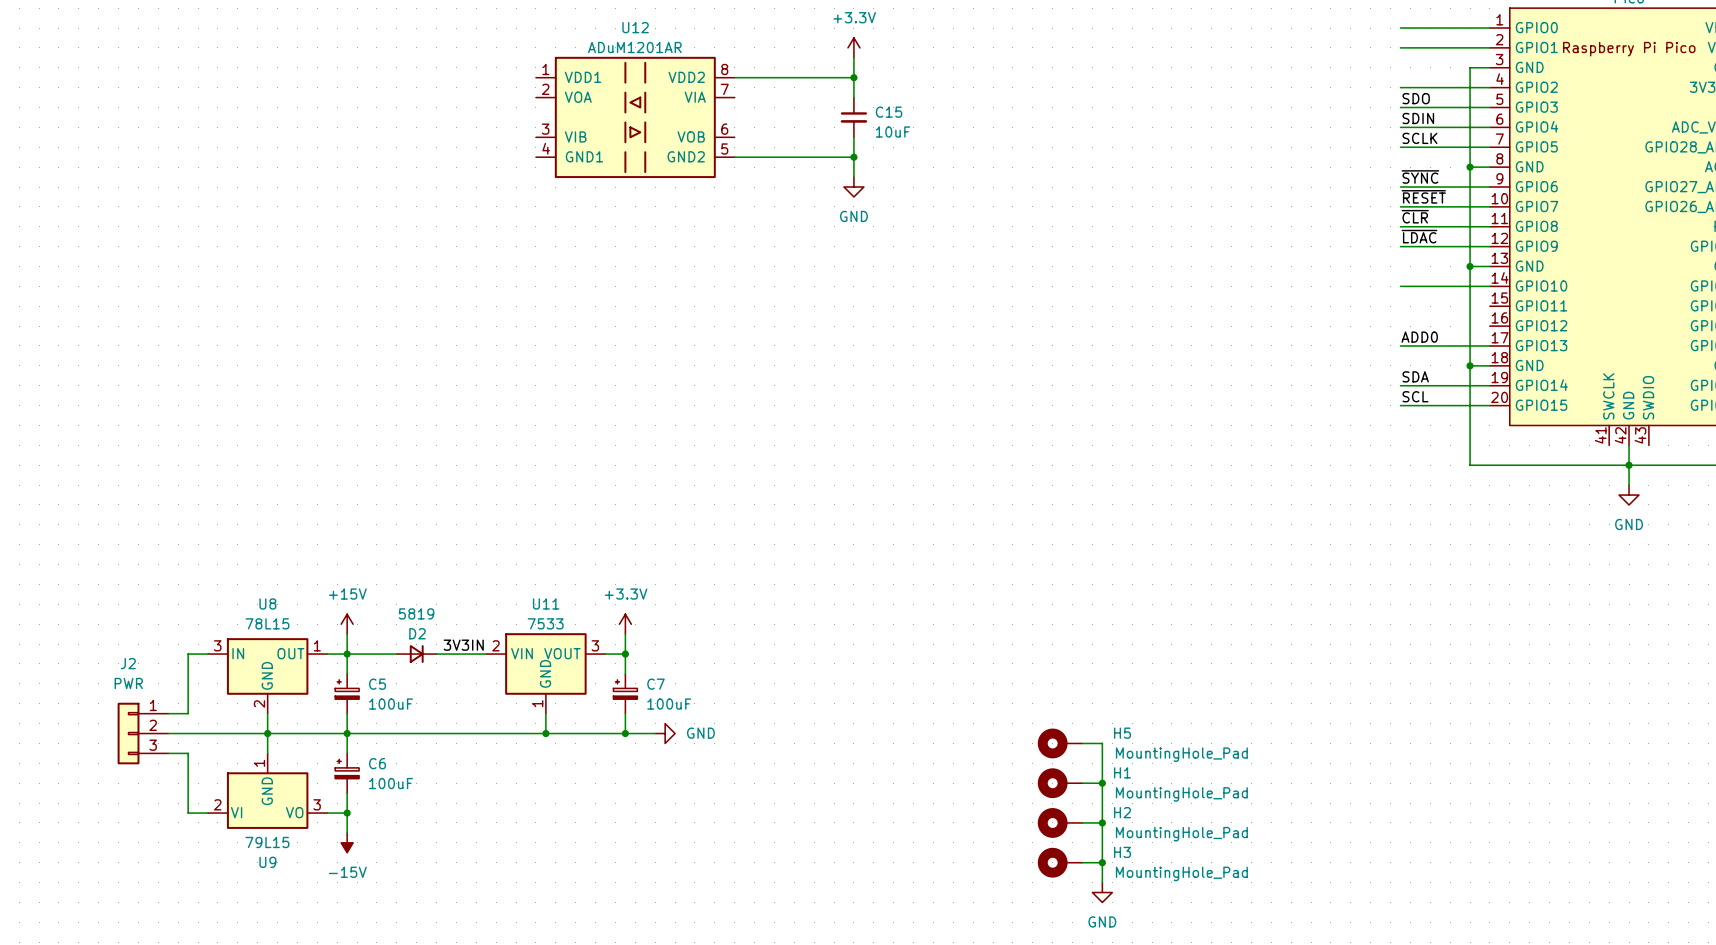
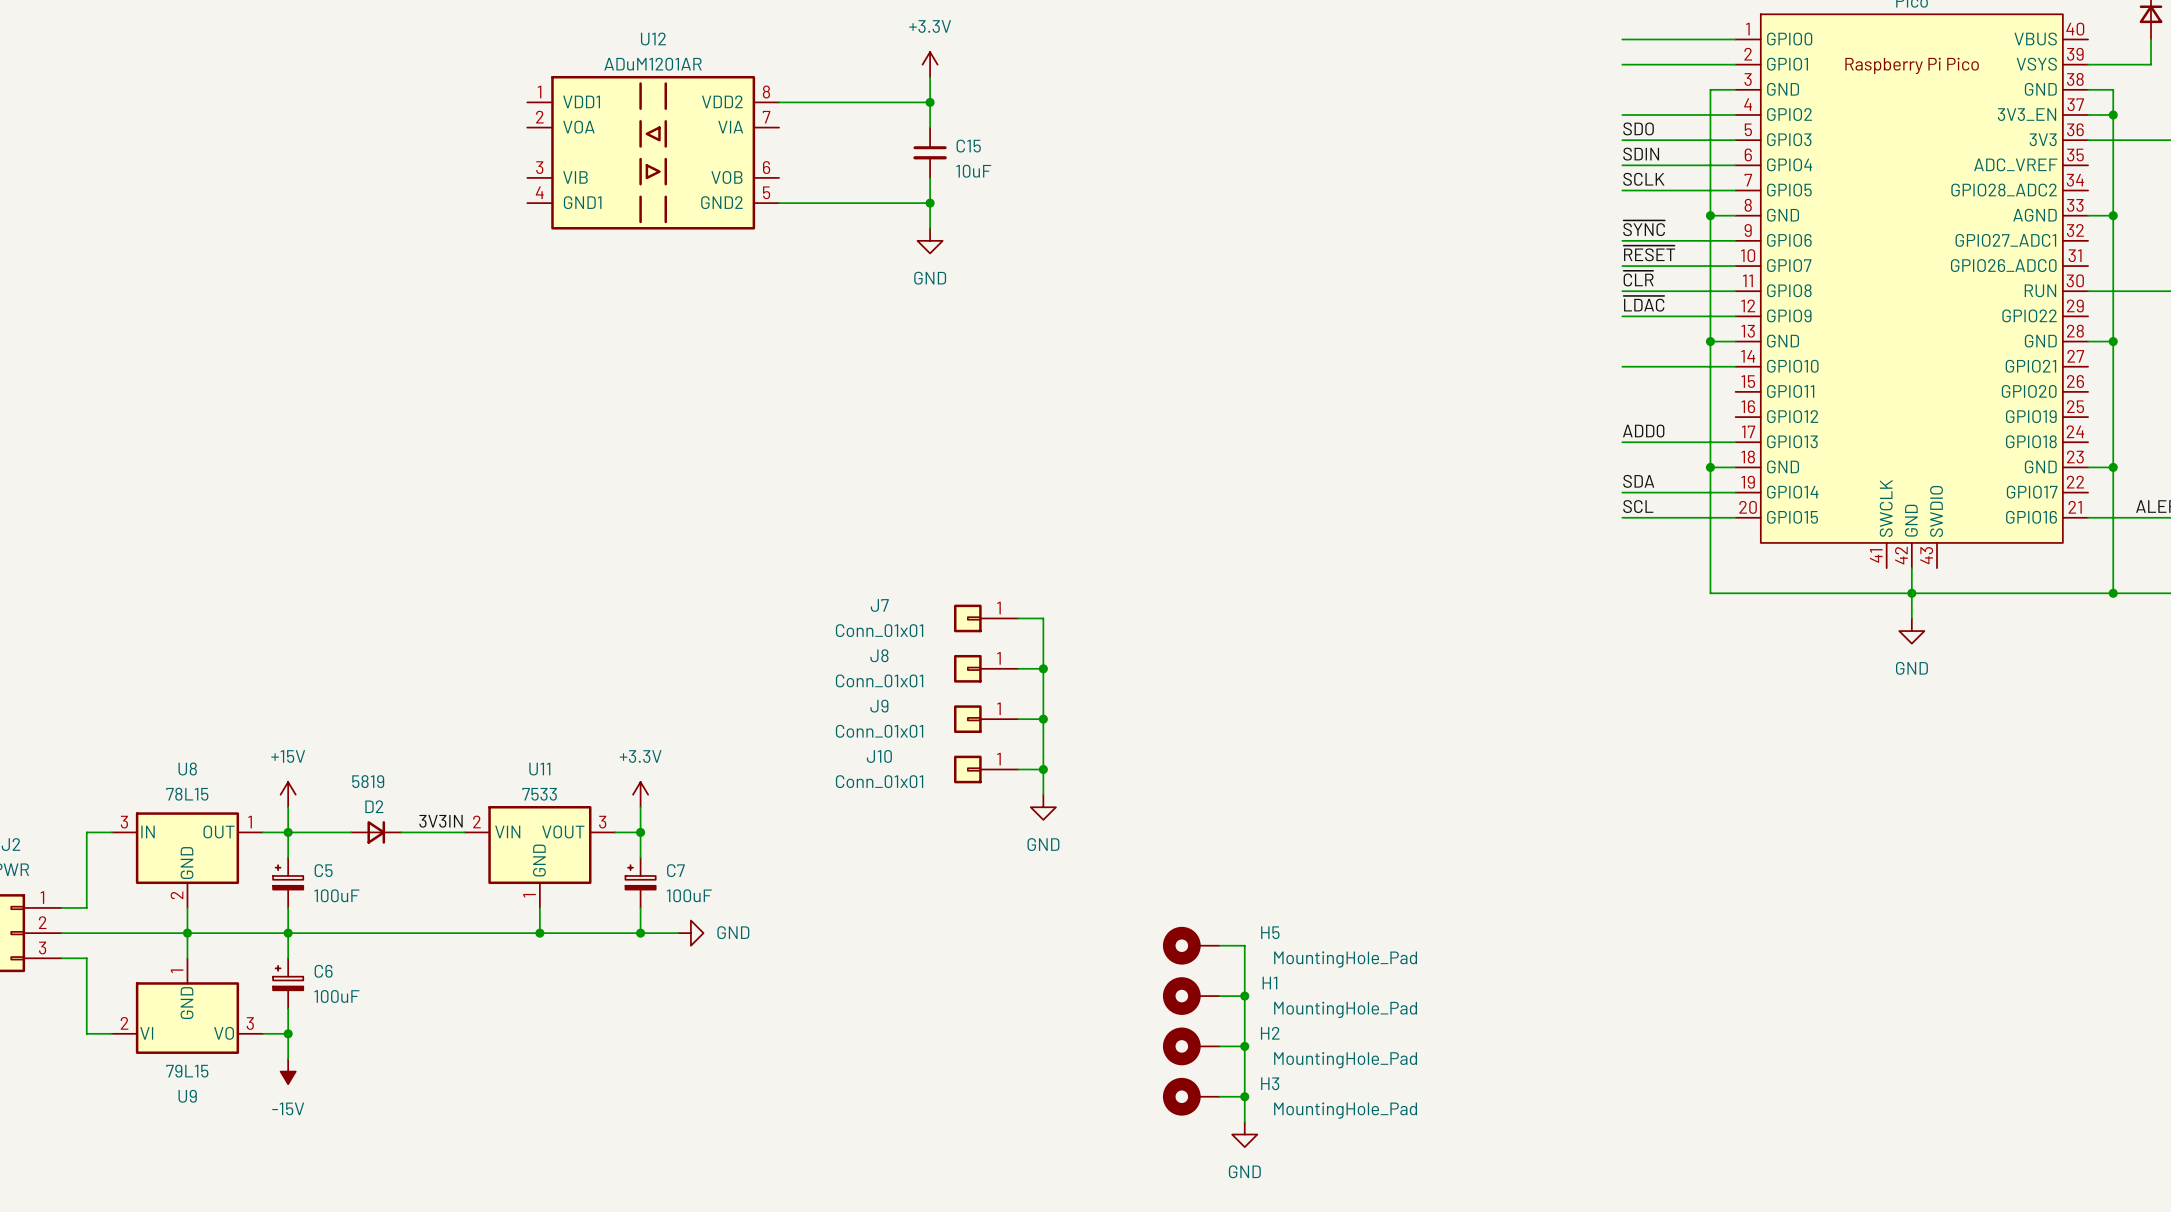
J7: none -> Conn_01x01 (986, 618)
wire: none -> (1018, 618) (1043, 618) (1043, 794)
J8: none -> Conn_01x01 (986, 668)
wire: none -> (1018, 668) (1043, 668)
junction: none -> (1043, 668)
J9: none -> Conn_01x01 (986, 719)
wire: none -> (1018, 719) (1043, 719)
junction: none -> (1043, 719)
J10: none -> Conn_01x01 (986, 769)
wire: none -> (1018, 769) (1043, 769)
junction: none -> (1043, 769)
power symbol: none -> GND (1043, 807)

